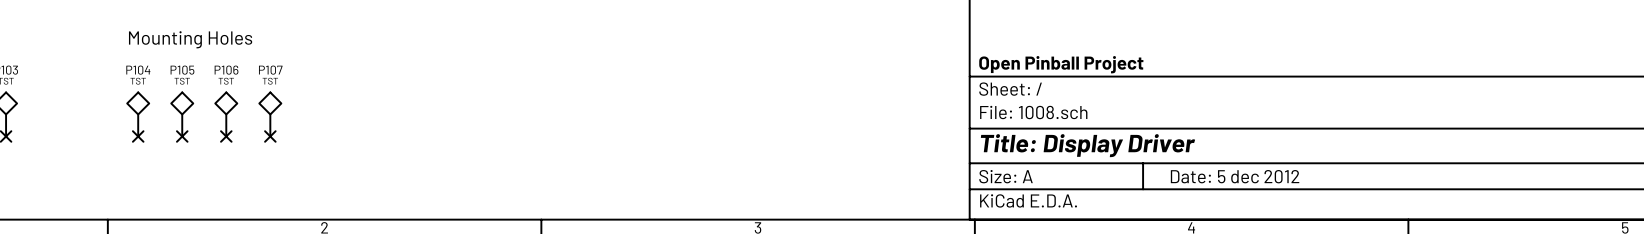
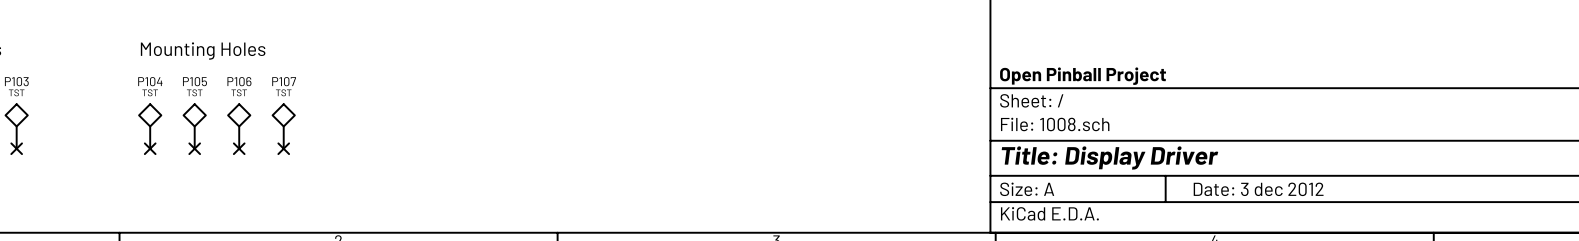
title block: Date: 5 dec 2012 (1235, 176) -> Date: 3 dec 2012 (1258, 189)

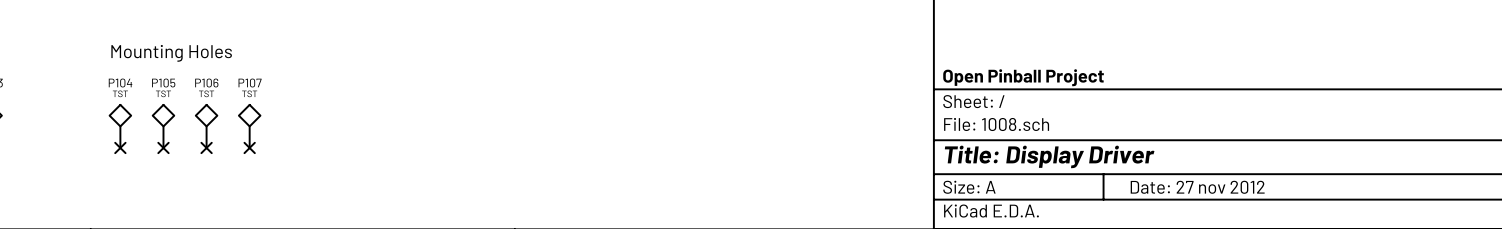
title block: Date: 3 dec 2012 (1258, 189) -> Date: 27 nov 2012 (1197, 187)

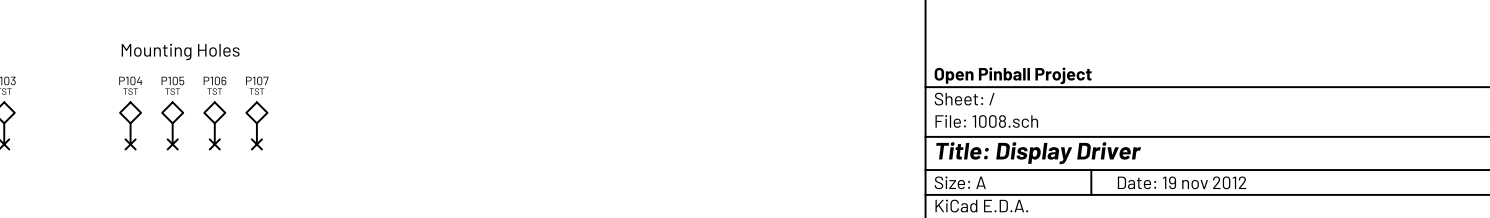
title block: Date: 27 nov 2012 (1197, 187) -> Date: 19 nov 2012 (1182, 182)

